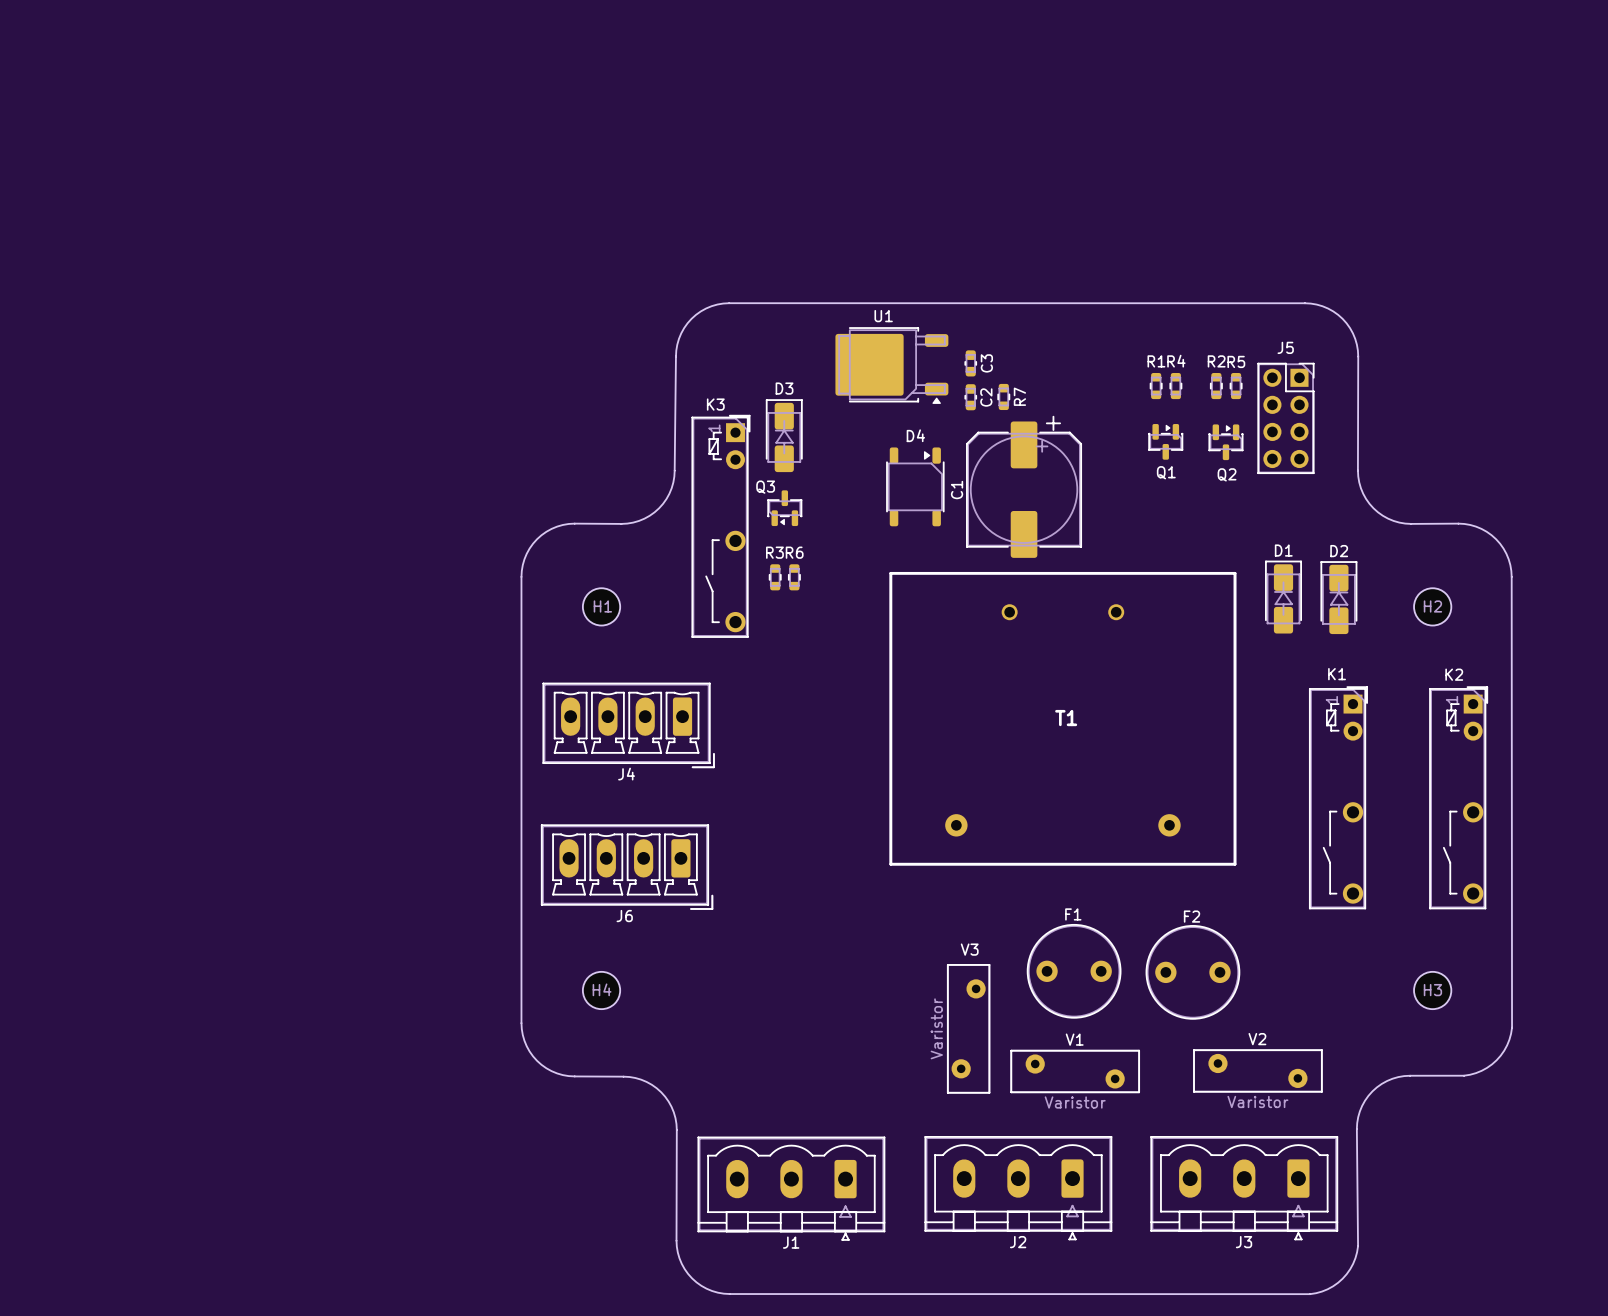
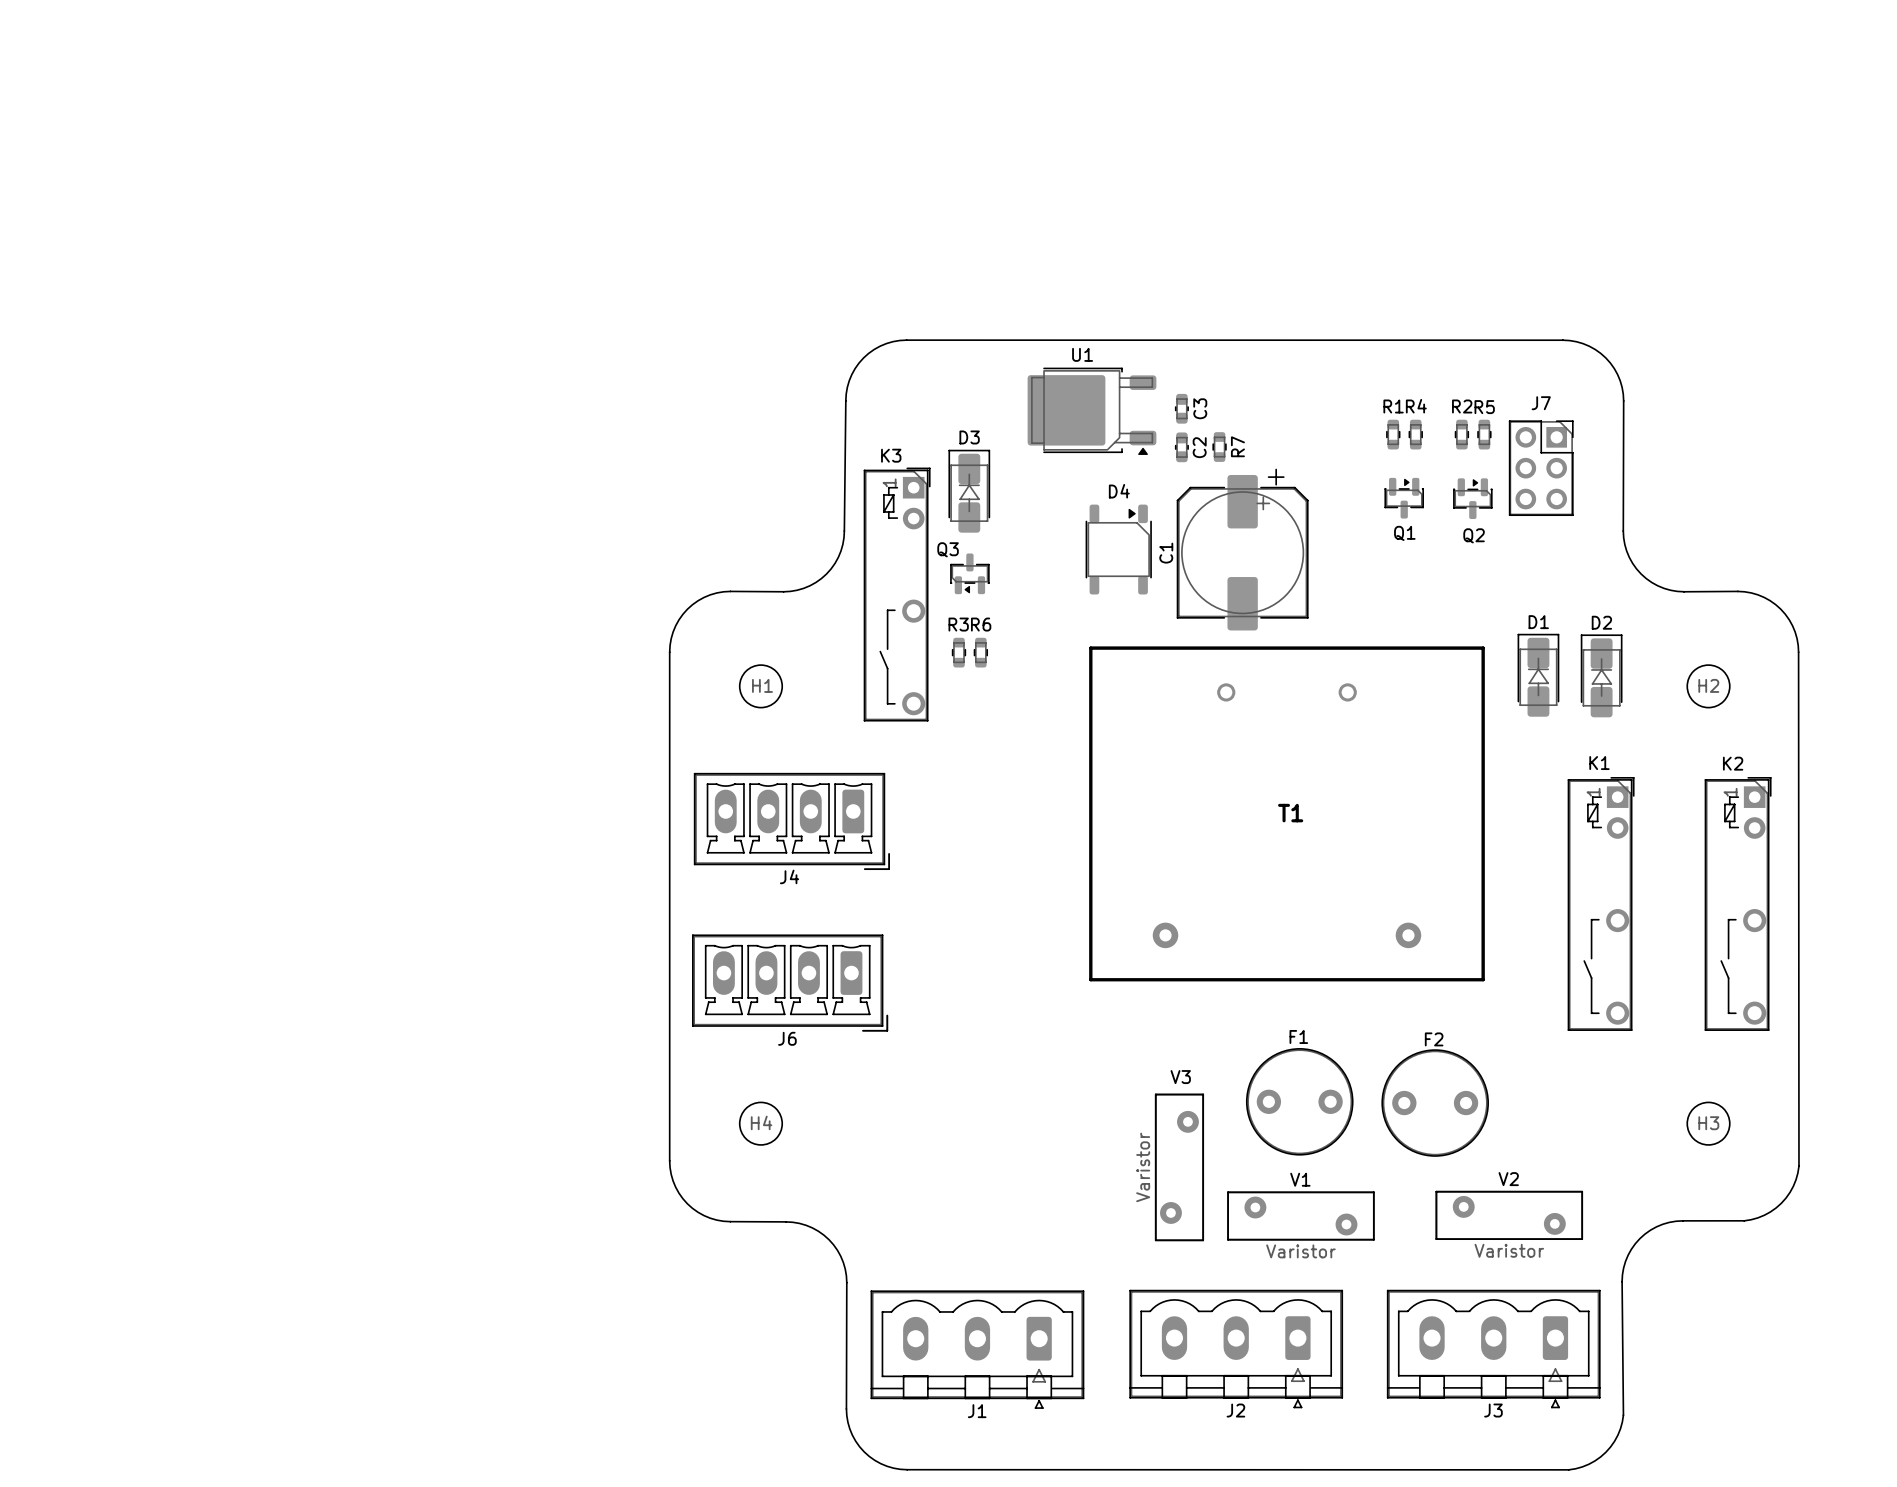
J7: none -> (1541, 468)
J5: (1285, 418) -> none

